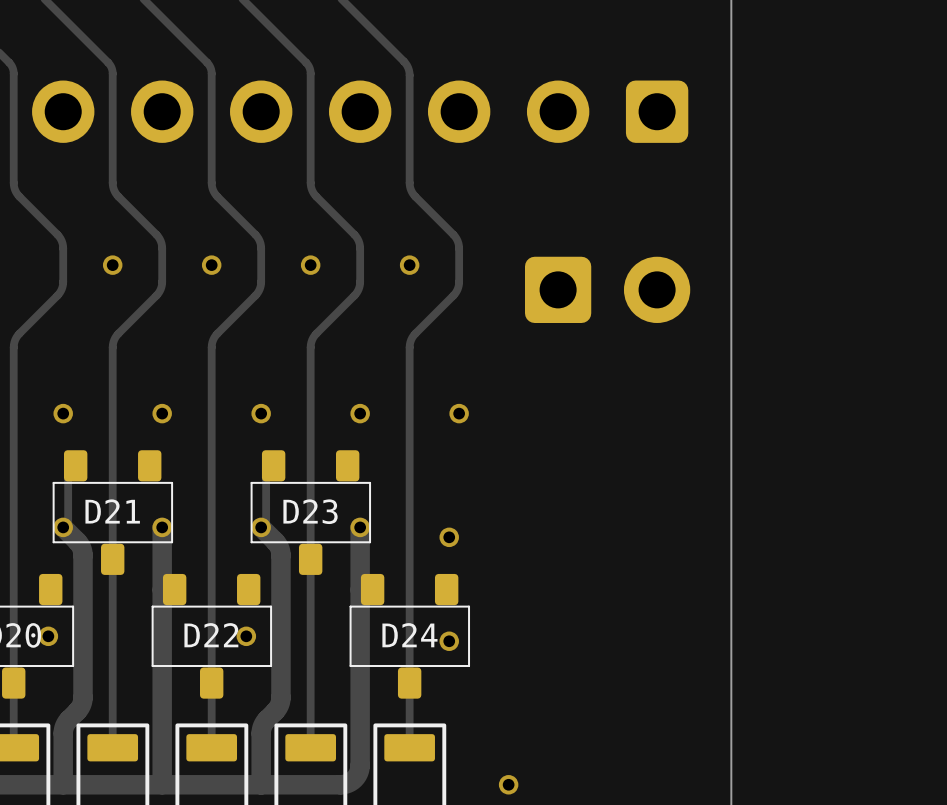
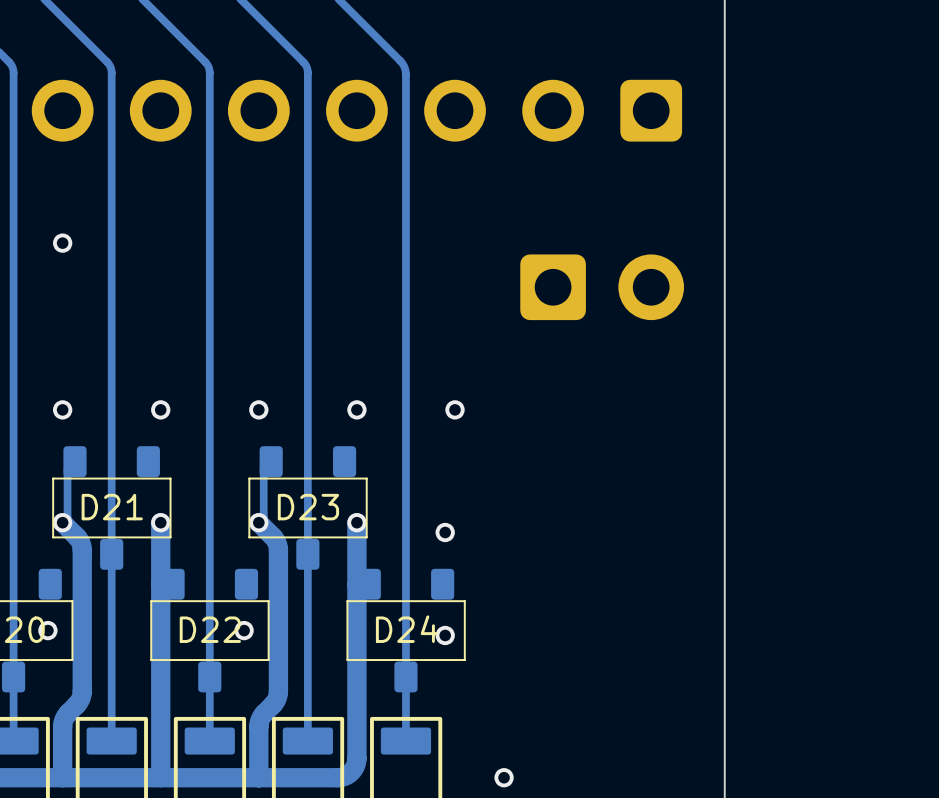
track: (13, 182) (18, 195) (59, 236) (63, 248) (63, 283) (60, 290) (17, 335) (13, 347) -> (13, 181) (13, 344)
track: (112, 182) (117, 195) (158, 236) (162, 248) (162, 283) (159, 290) (116, 335) (112, 347) -> (111, 181) (111, 344)
track: (211, 182) (216, 195) (257, 236) (261, 248) (261, 283) (258, 290) (215, 335) (211, 347) -> (209, 181) (209, 344)
track: (310, 182) (315, 195) (356, 236) (360, 248) (360, 283) (357, 290) (314, 335) (310, 347) -> (307, 181) (307, 344)
track: (409, 182) (414, 195) (455, 236) (459, 248) (459, 283) (456, 290) (413, 335) (409, 347) -> (405, 181) (405, 344)
via: none -> (62, 243)
via: (112, 265) -> none
via: (211, 265) -> none
via: (310, 265) -> none
via: (409, 265) -> none

